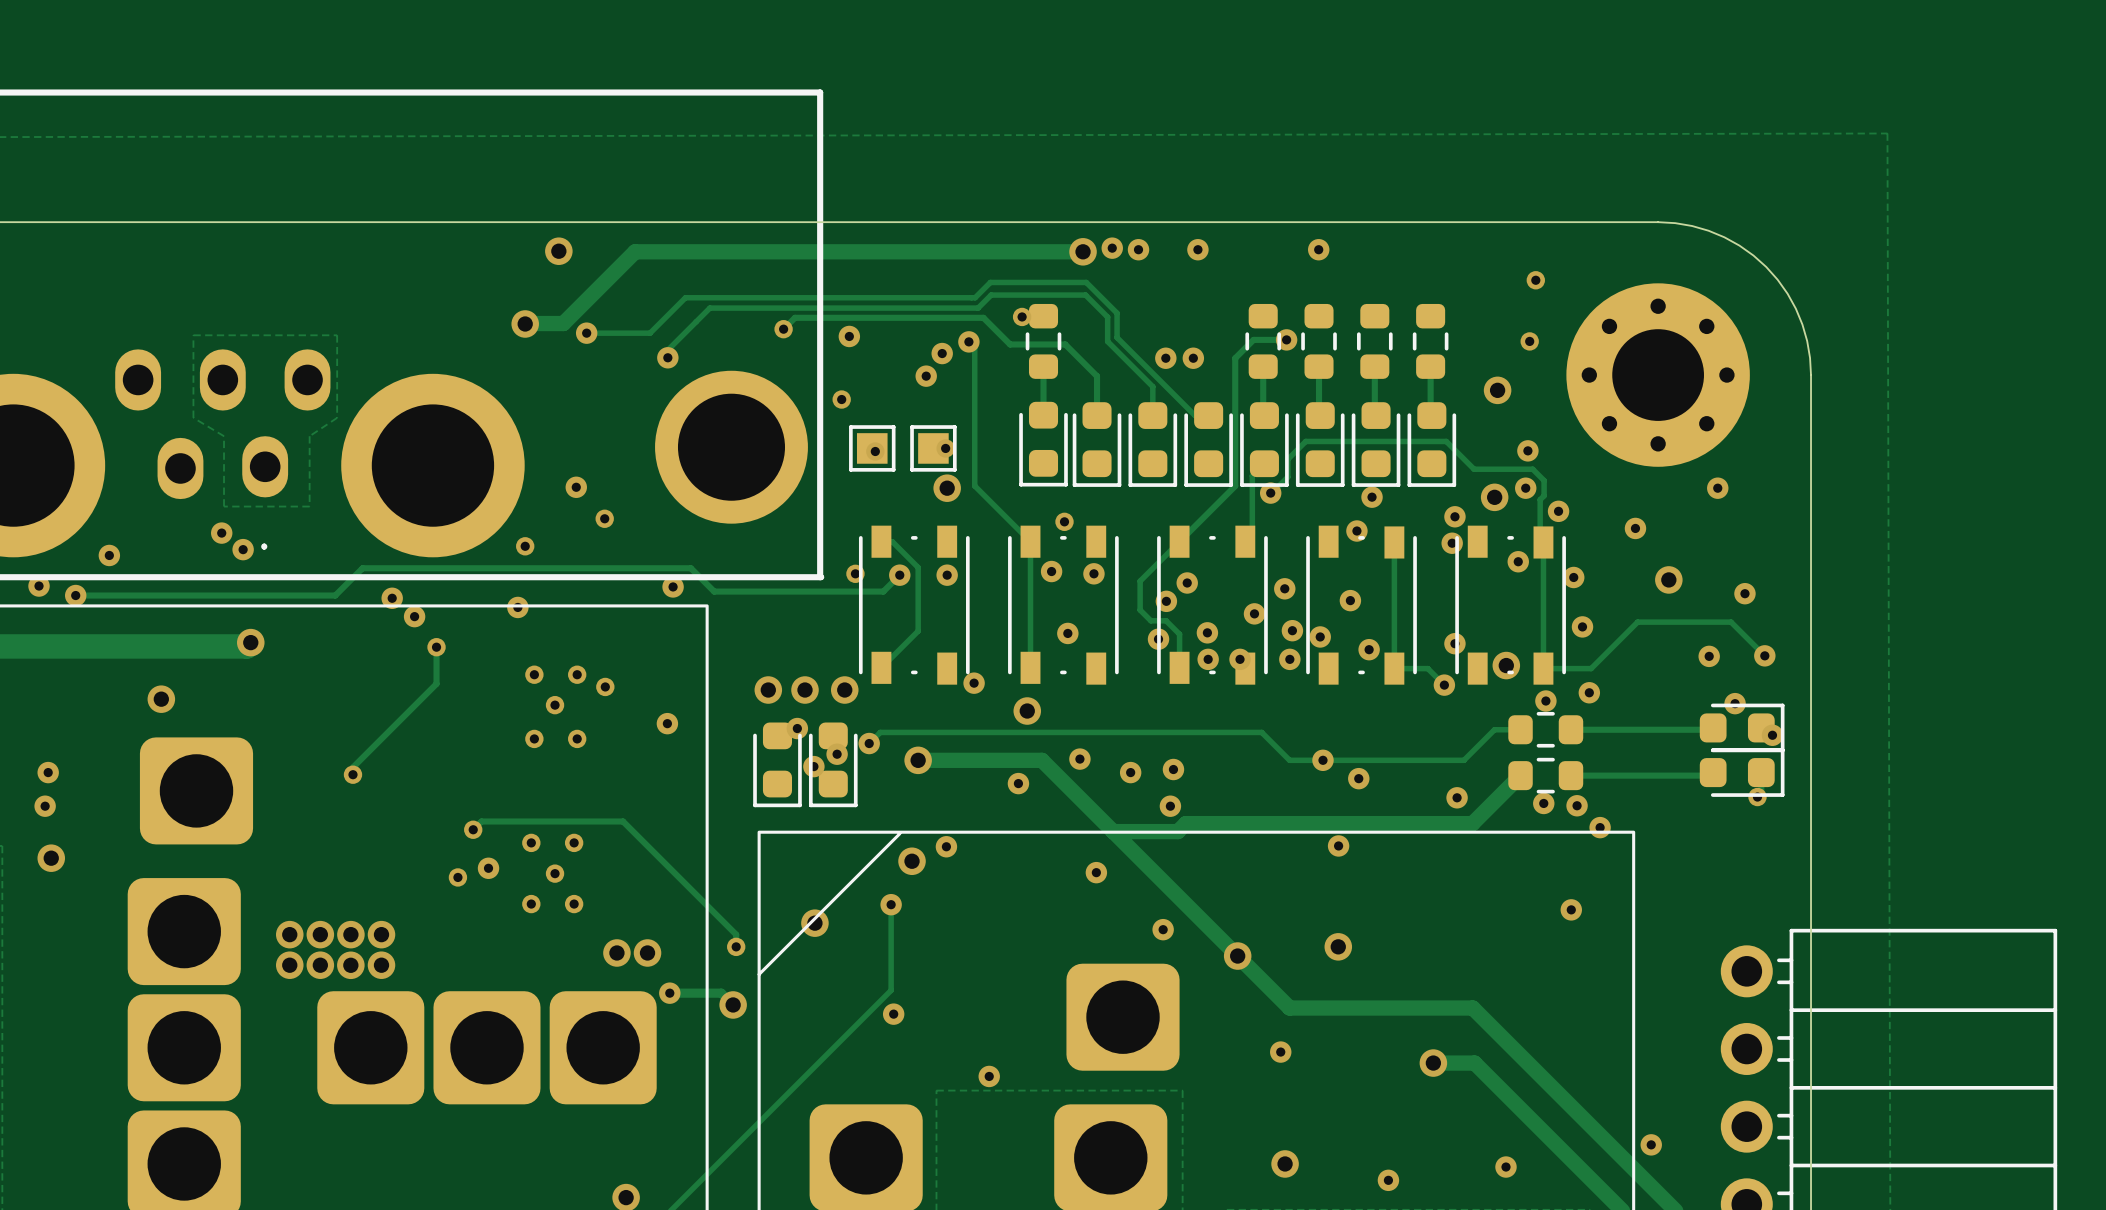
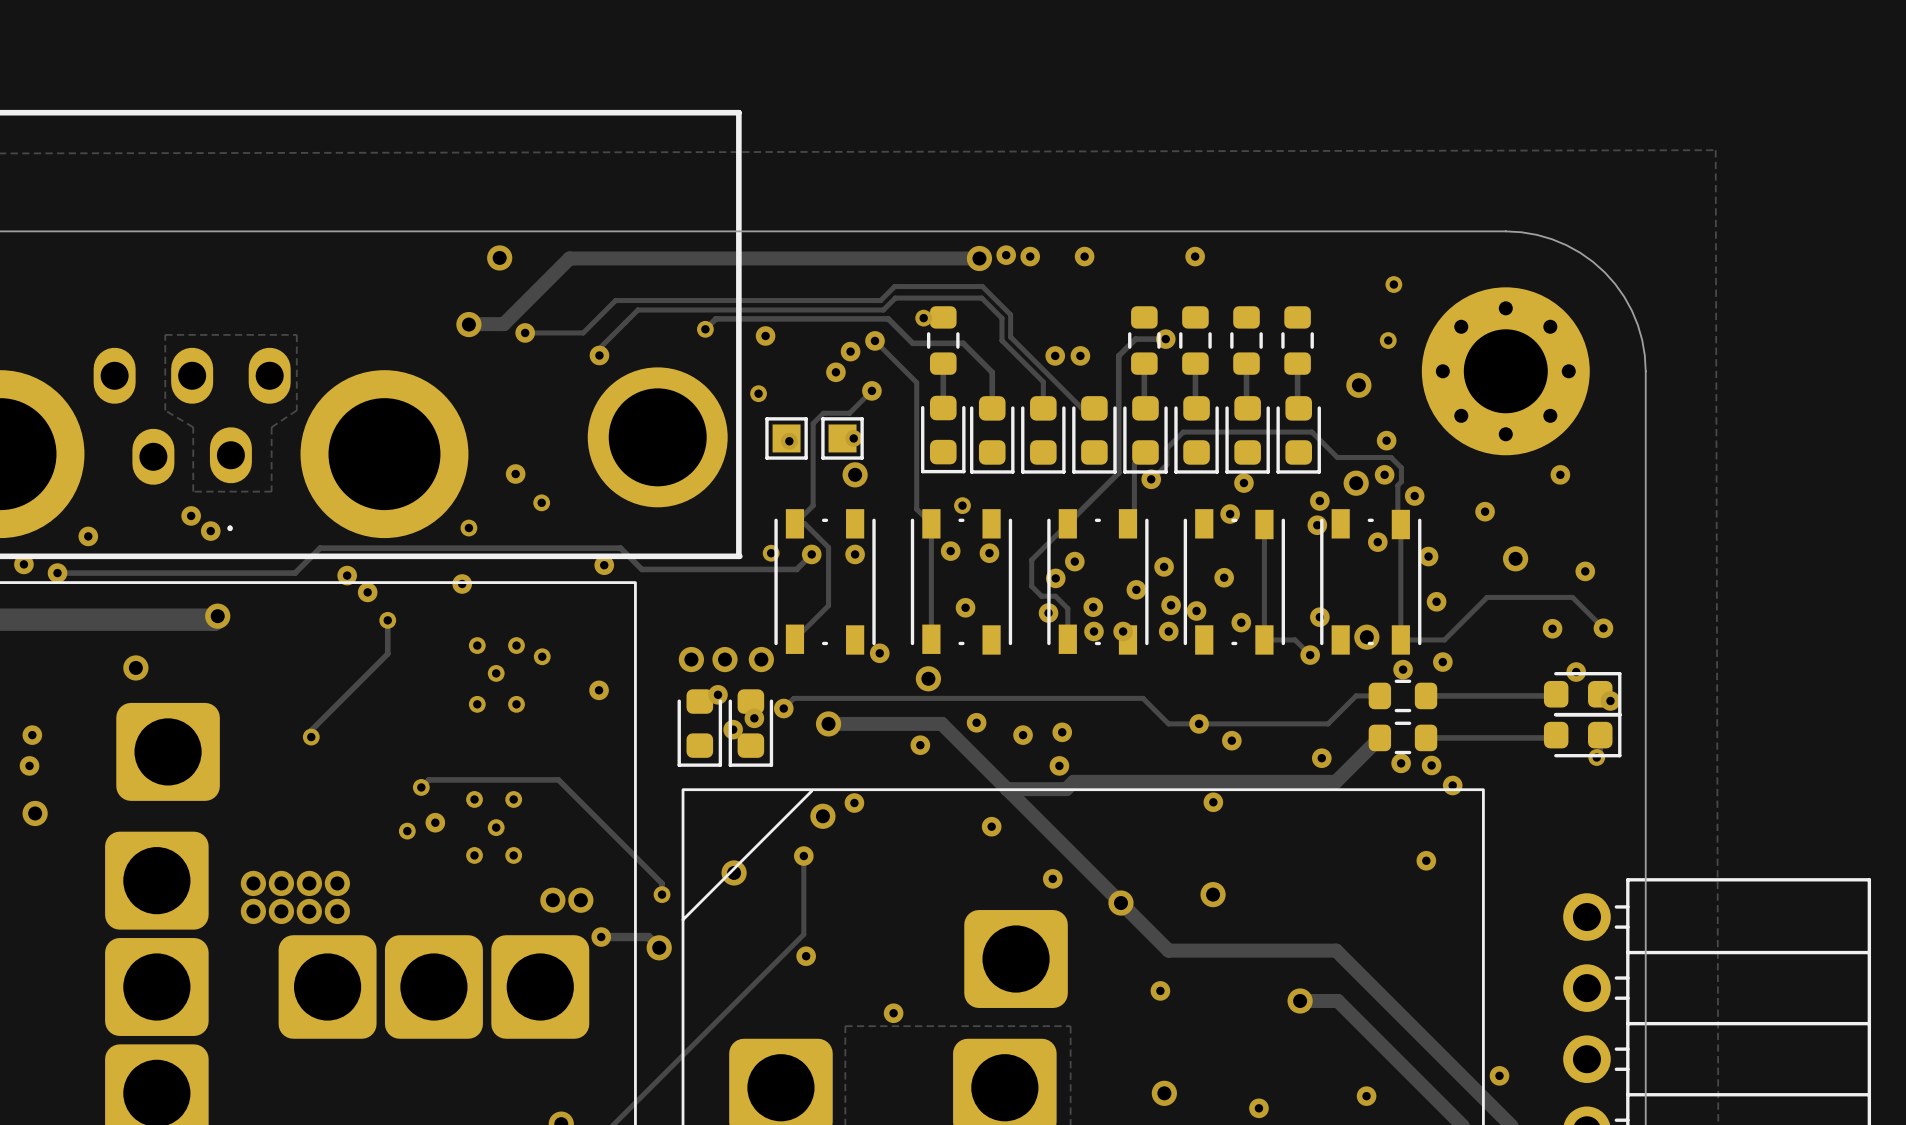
track: (974, 347) (974, 485) (1014, 525) -> (880, 346) (916, 382) (916, 509)
track: none -> (871, 390) (849, 413) (823, 413) (813, 423) (813, 505) (794, 523)
via: none -> (871, 390)

